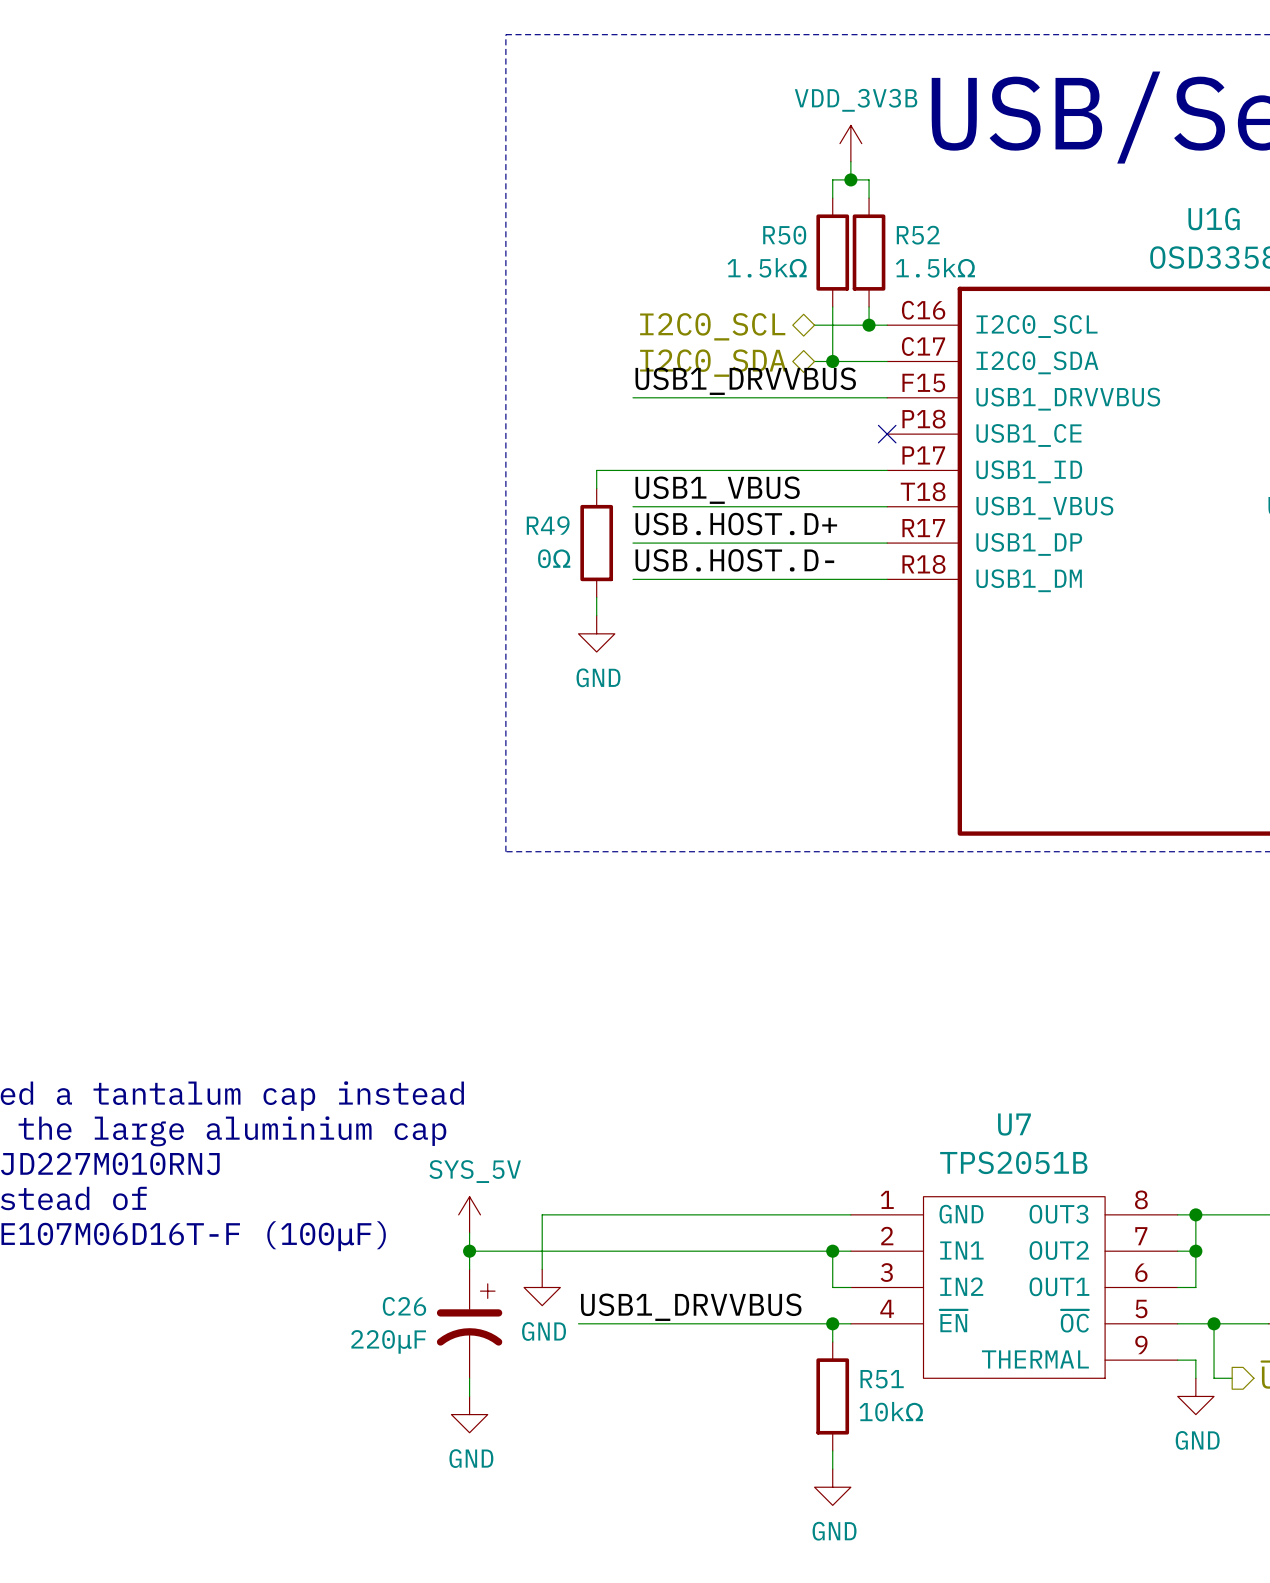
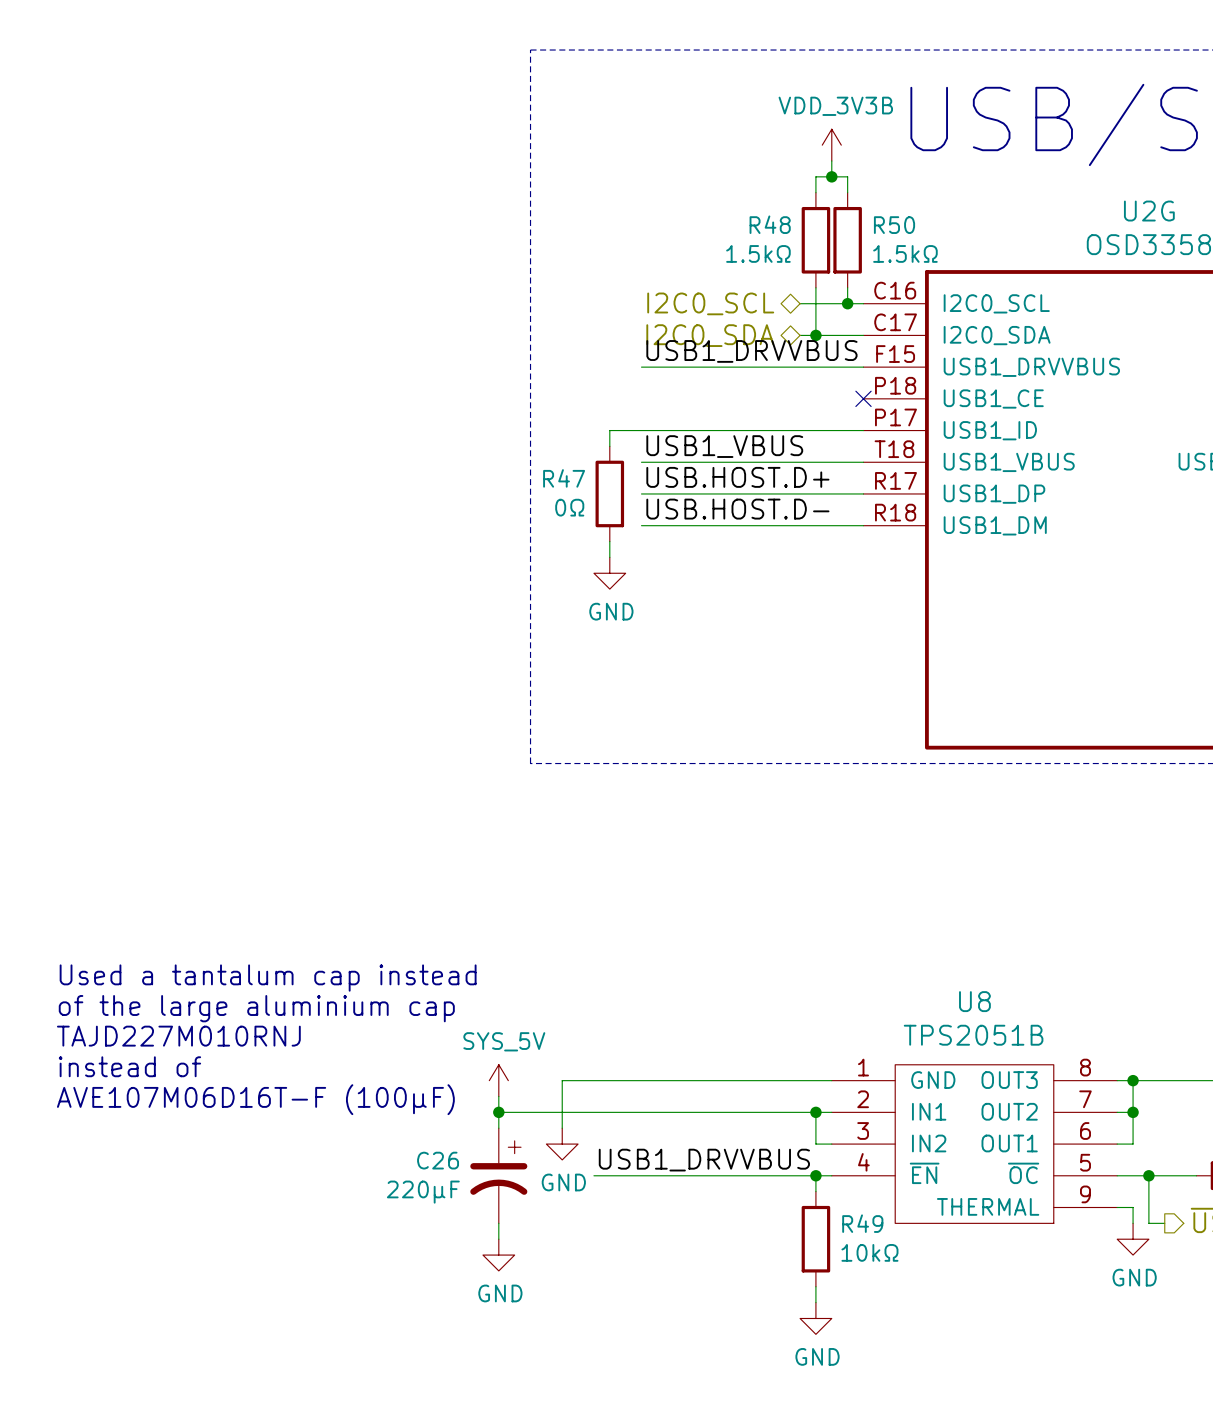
U1G name: U1G (1214, 219) -> U2G (1149, 211)
R50 name: R50 (784, 235) -> R48 (770, 224)
R52 name: R52 (918, 235) -> R50 (894, 225)
R49 name: R49 (548, 525) -> R47 (564, 478)
U7 name: U7 (1014, 1124) -> U8 (974, 1001)
R51 name: R51 (882, 1379) -> R49 (862, 1223)

